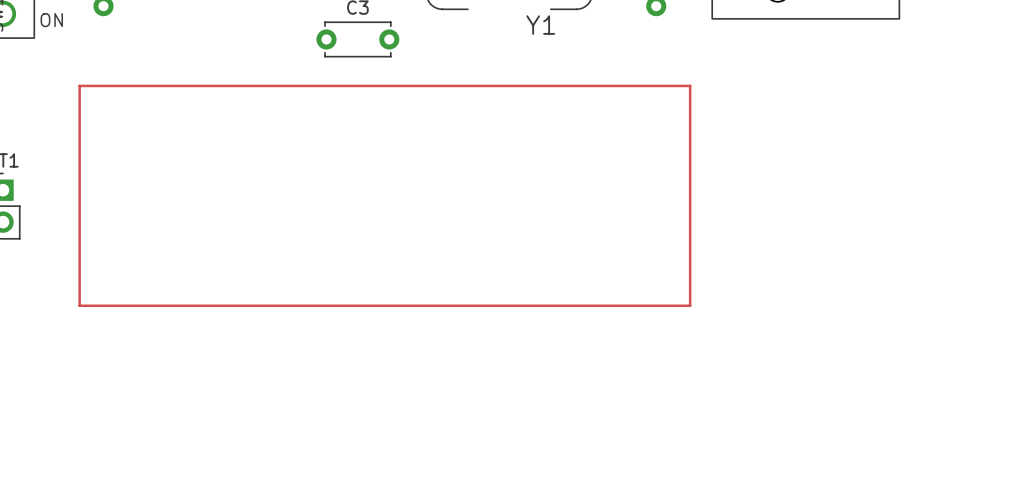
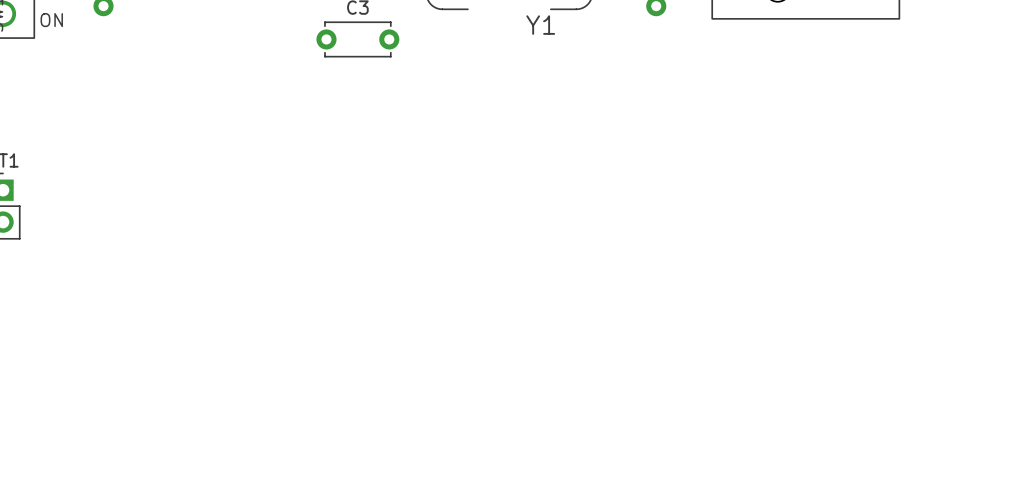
top track: (79, 85) (690, 85) (690, 305) (79, 305) (79, 85) -> none

